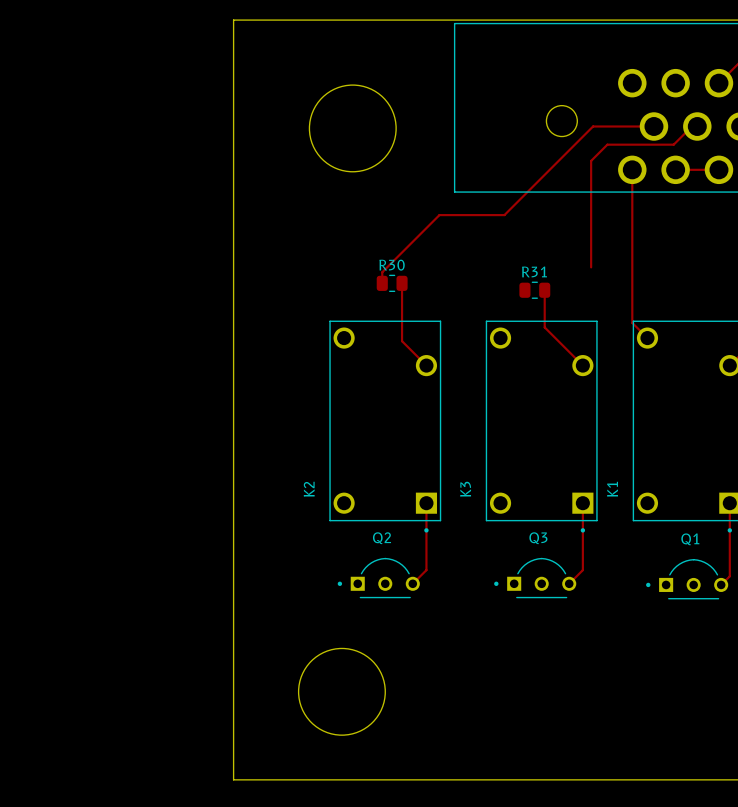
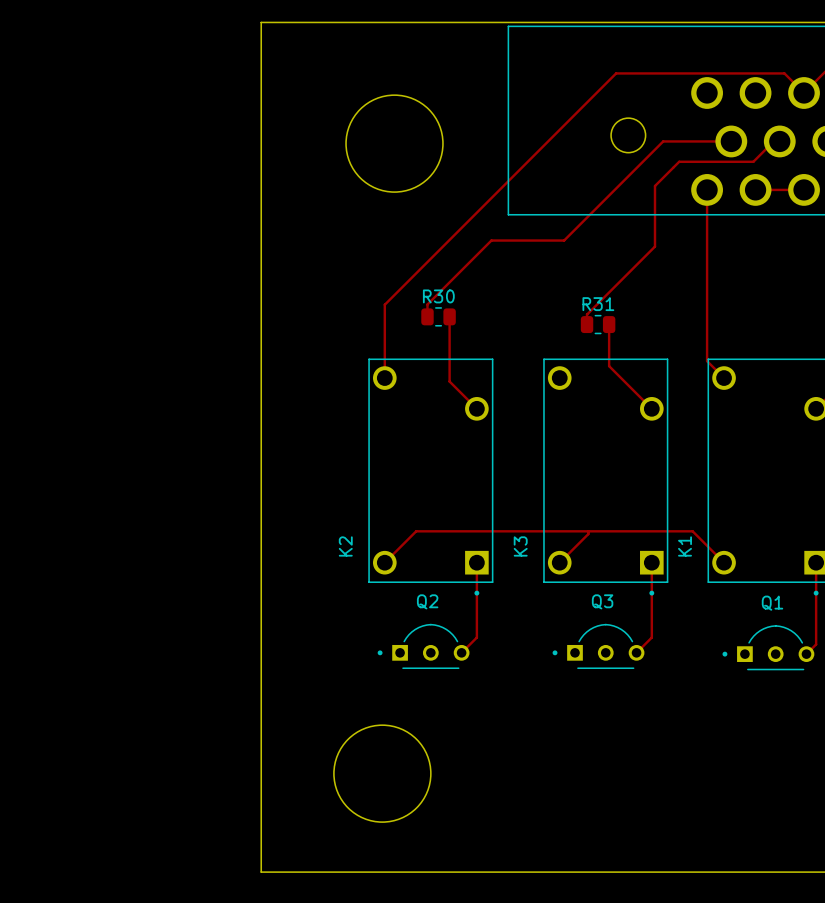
track: none -> (804, 93) (784, 73) (616, 73) (384, 304) (384, 378)
track: (591, 160) (591, 267) -> (661, 179) (654, 186) (654, 246) (587, 314) (587, 324)
track: none -> (588, 531) (588, 534) (559, 562)
track: none -> (384, 562) (416, 531) (692, 531) (724, 562)

